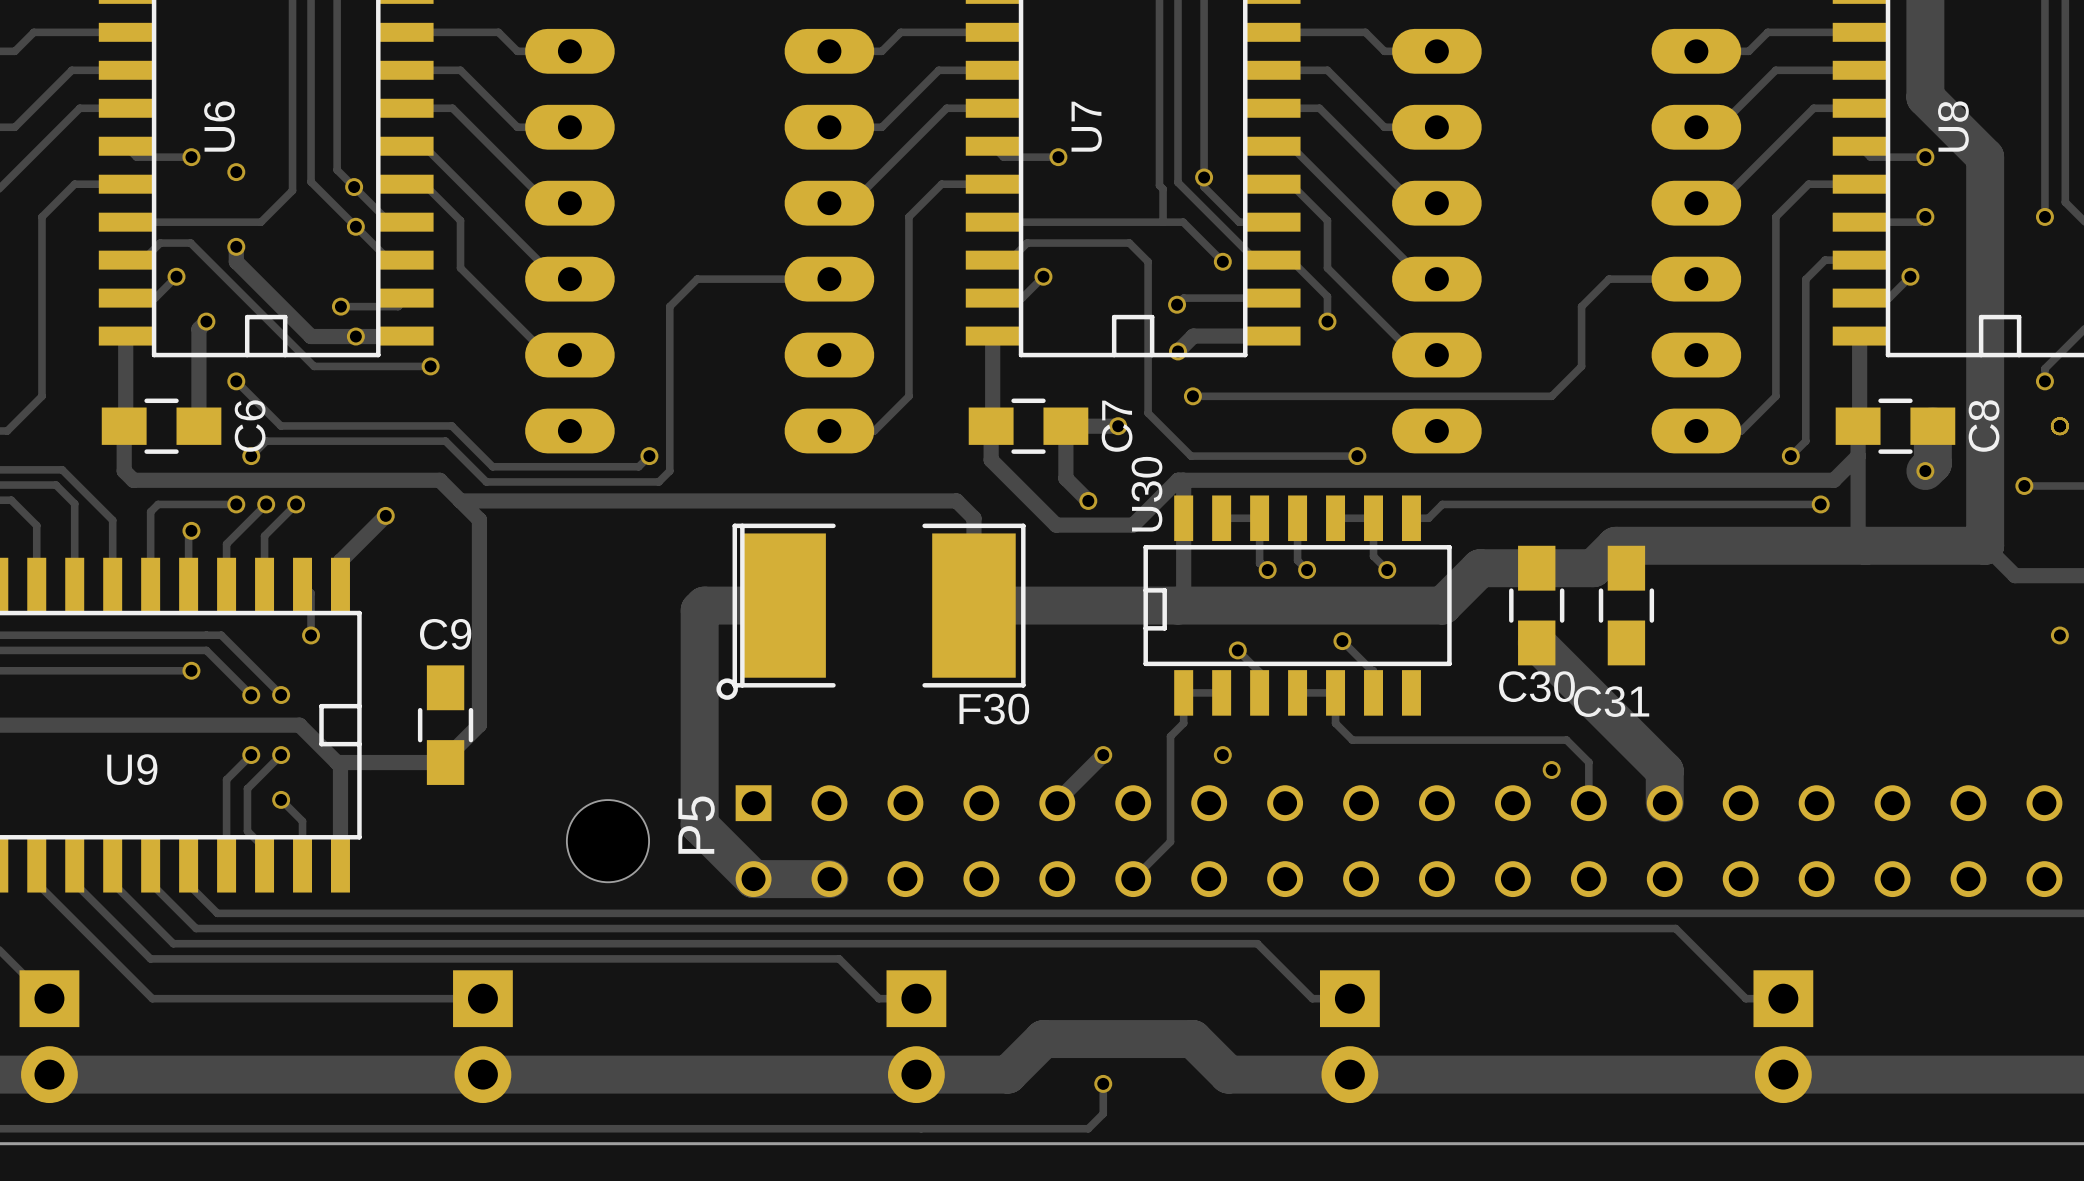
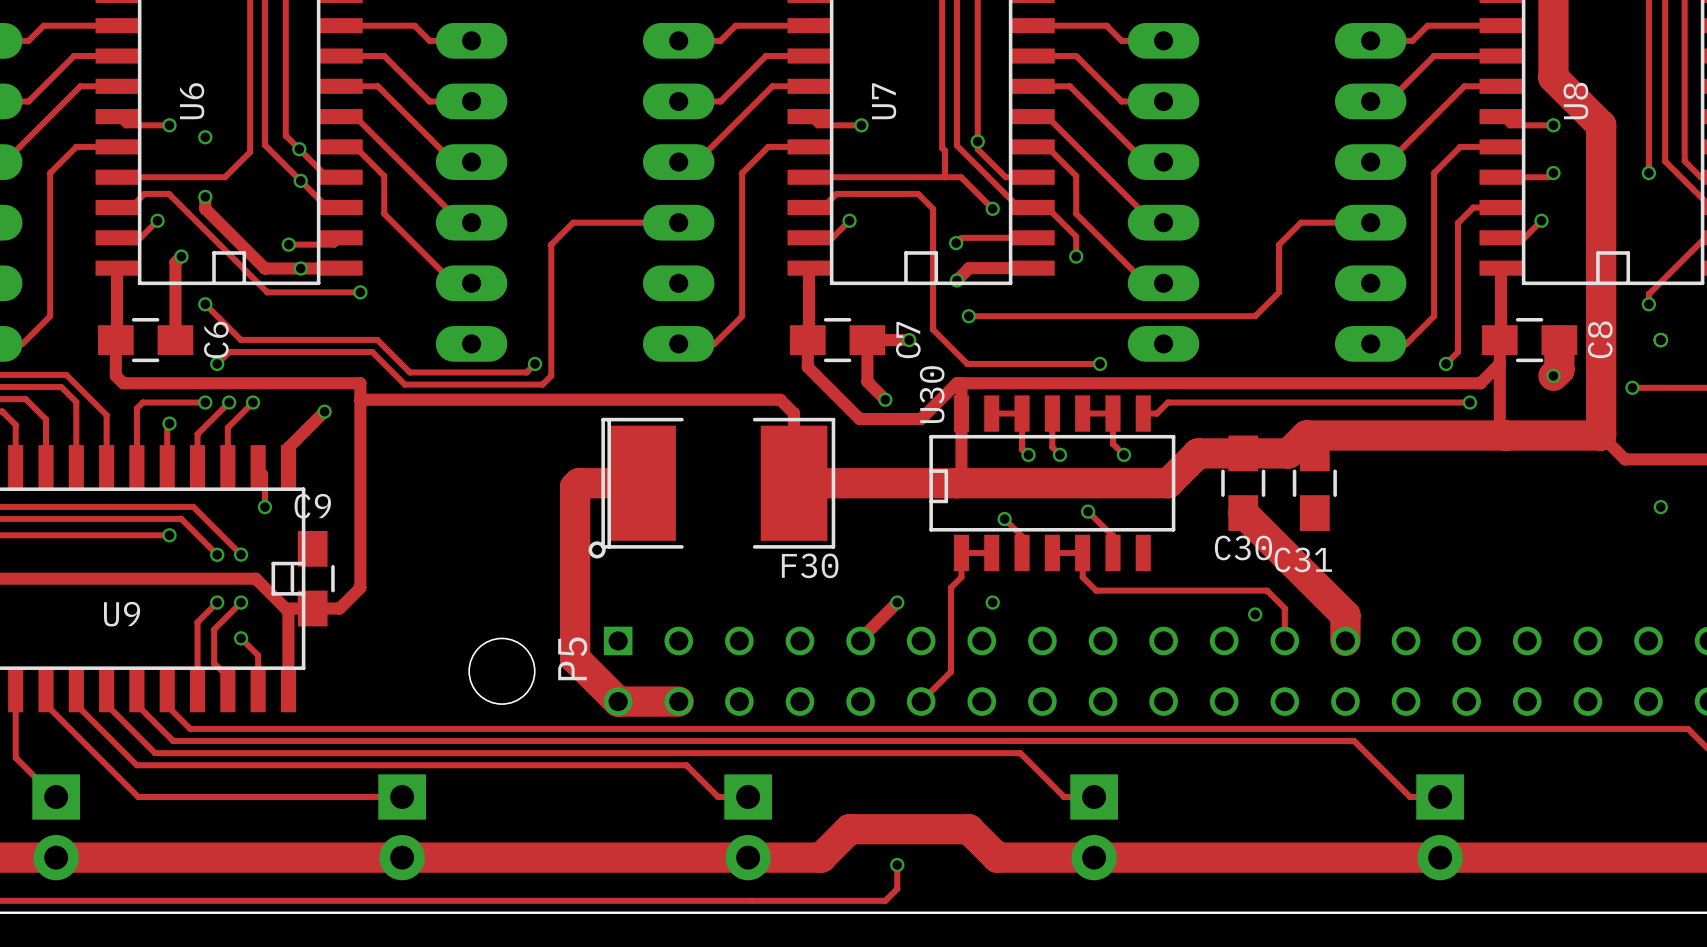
track: (430, 480) (439, 480) (479, 519) (479, 724) (445, 758) (445, 762) (404, 762) -> (360, 383) (360, 587) (339, 608)
track: none -> (360, 399) (384, 399)
C9 position: (445, 725) -> (312, 578)

